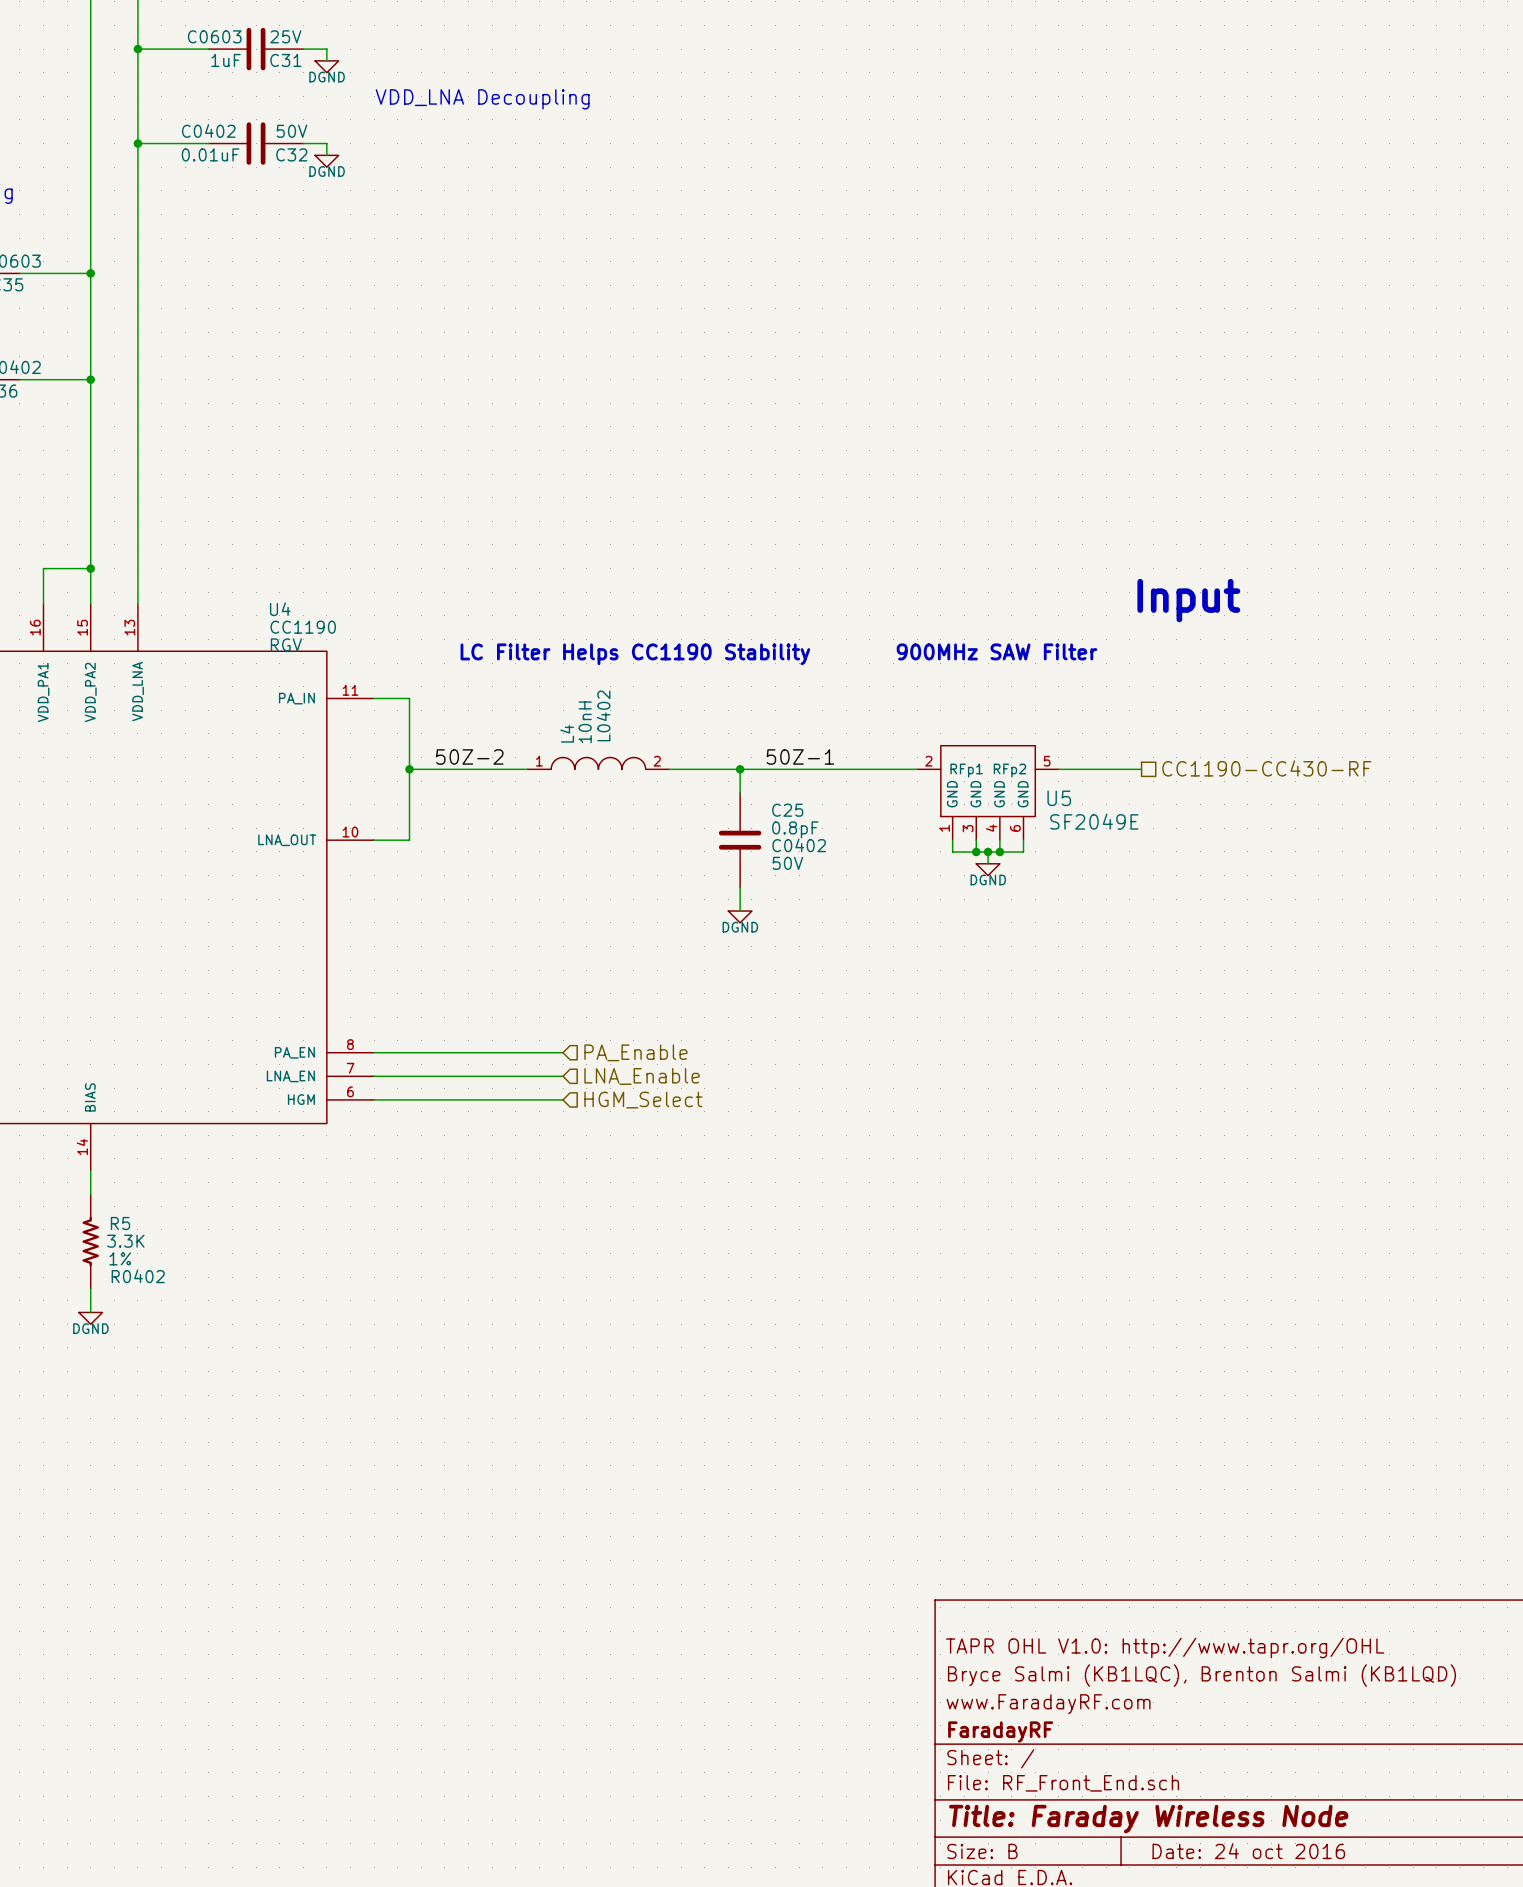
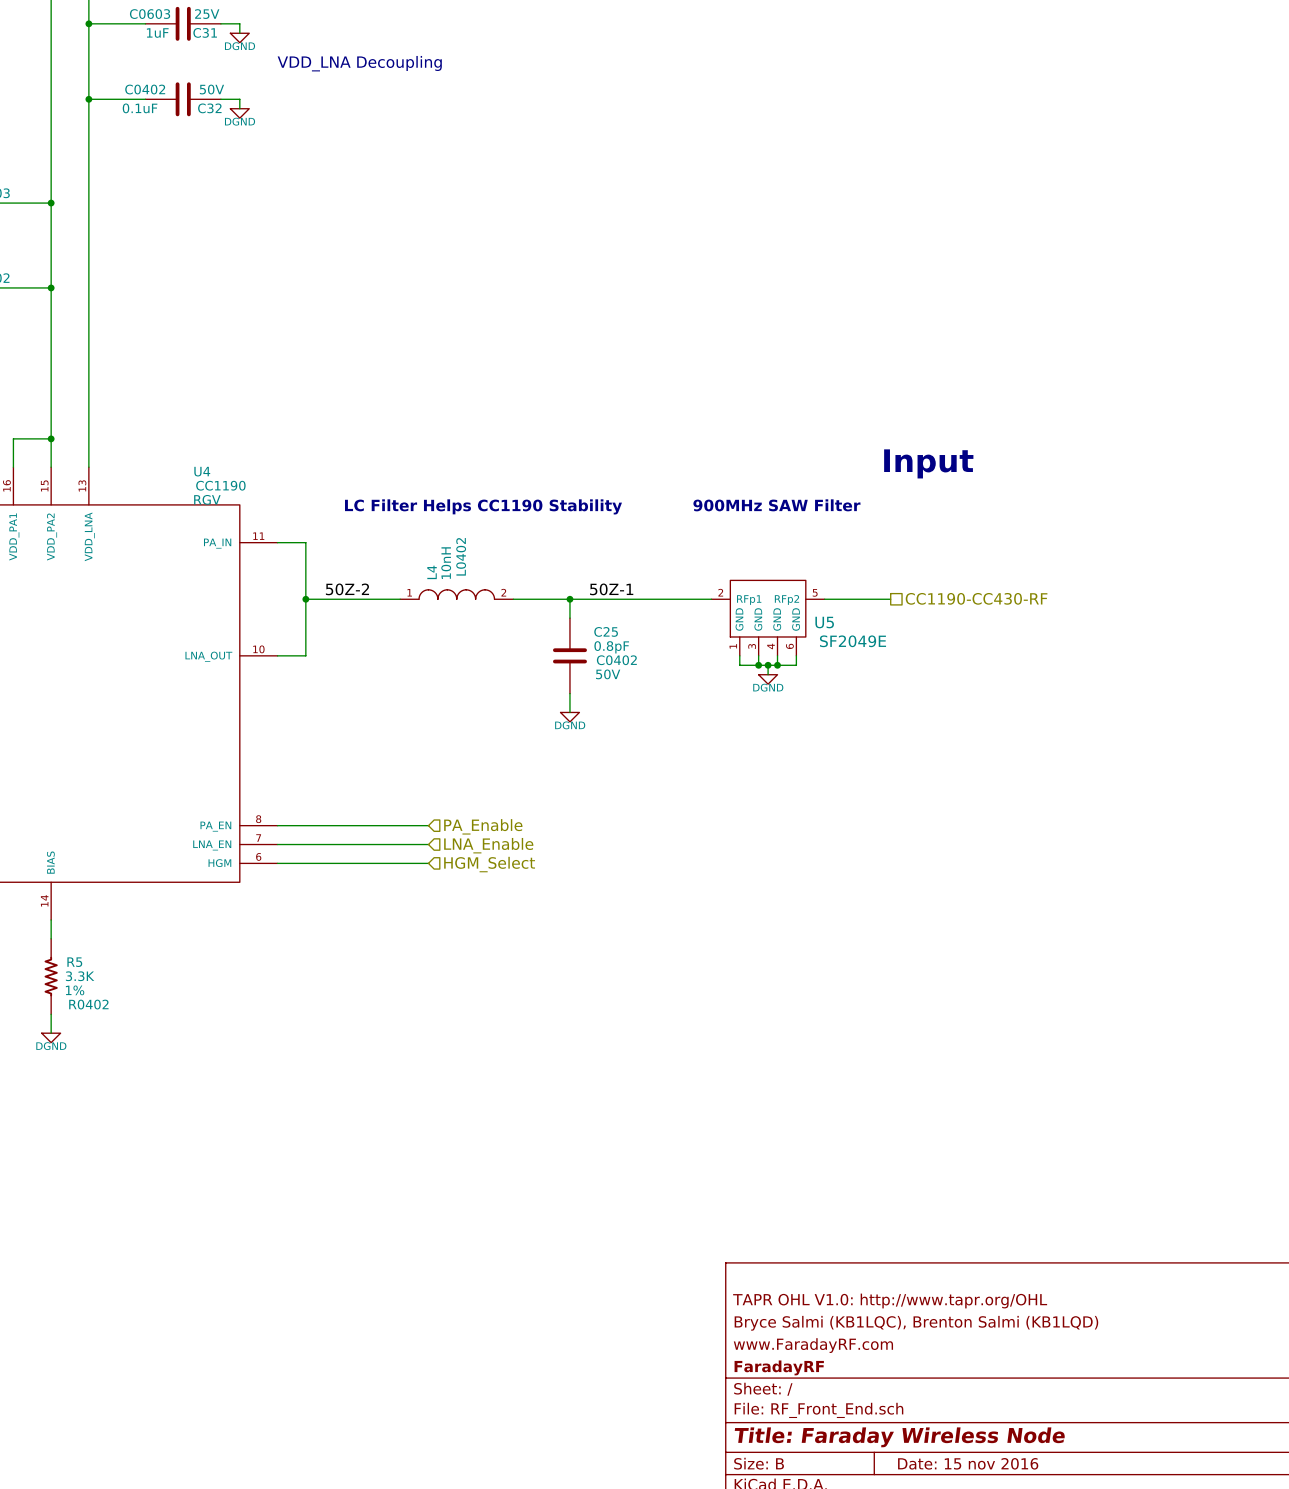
C32 value: 0.01uF (210, 154) -> 0.1uF (140, 108)
title block: Date: 24 oct 2016 (1248, 1851) -> Date: 15 nov 2016 (968, 1463)

